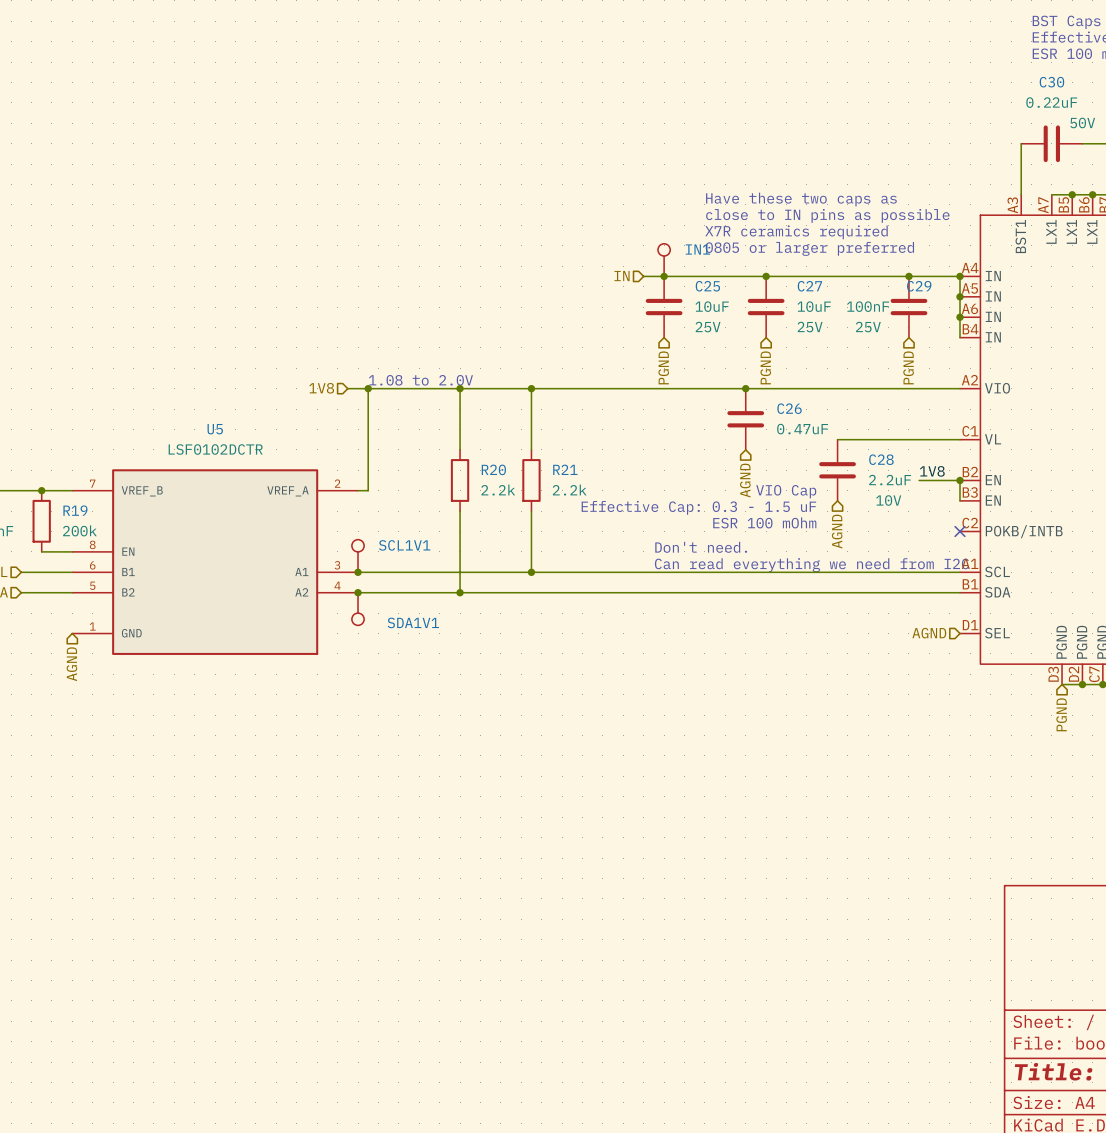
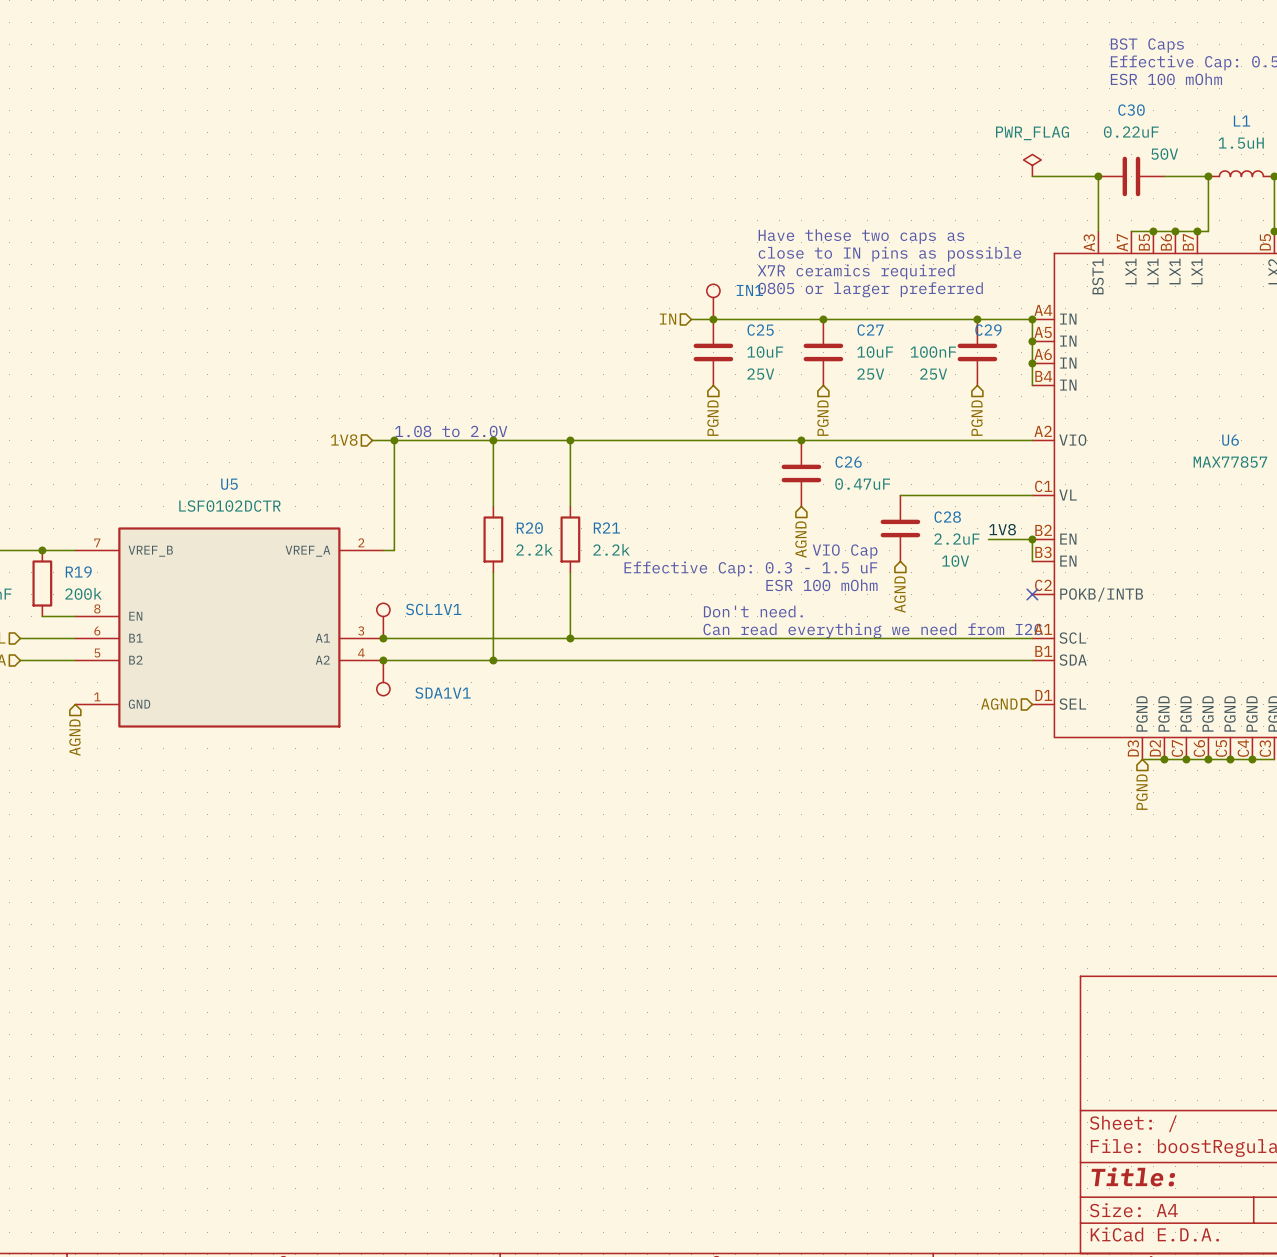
power symbol: none -> PWR_FLAG (1032, 165)
wire: none -> (1032, 176) (1098, 176)
junction: none -> (1098, 176)

